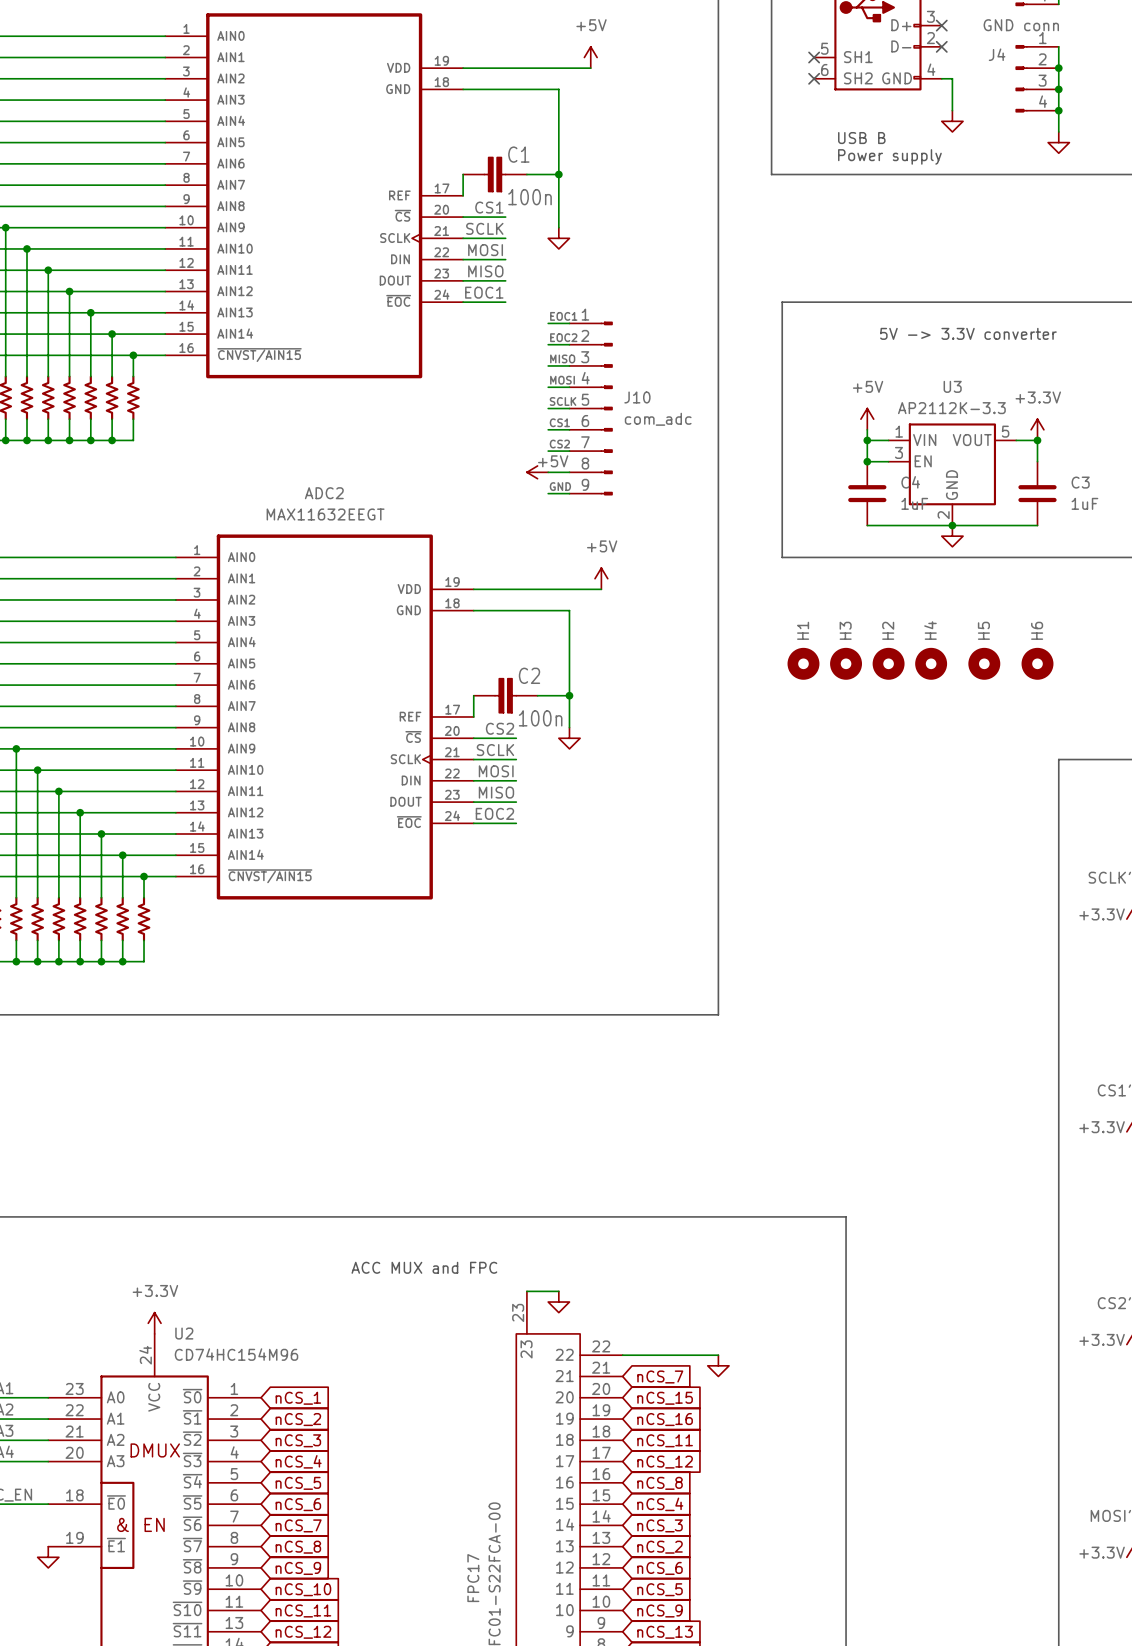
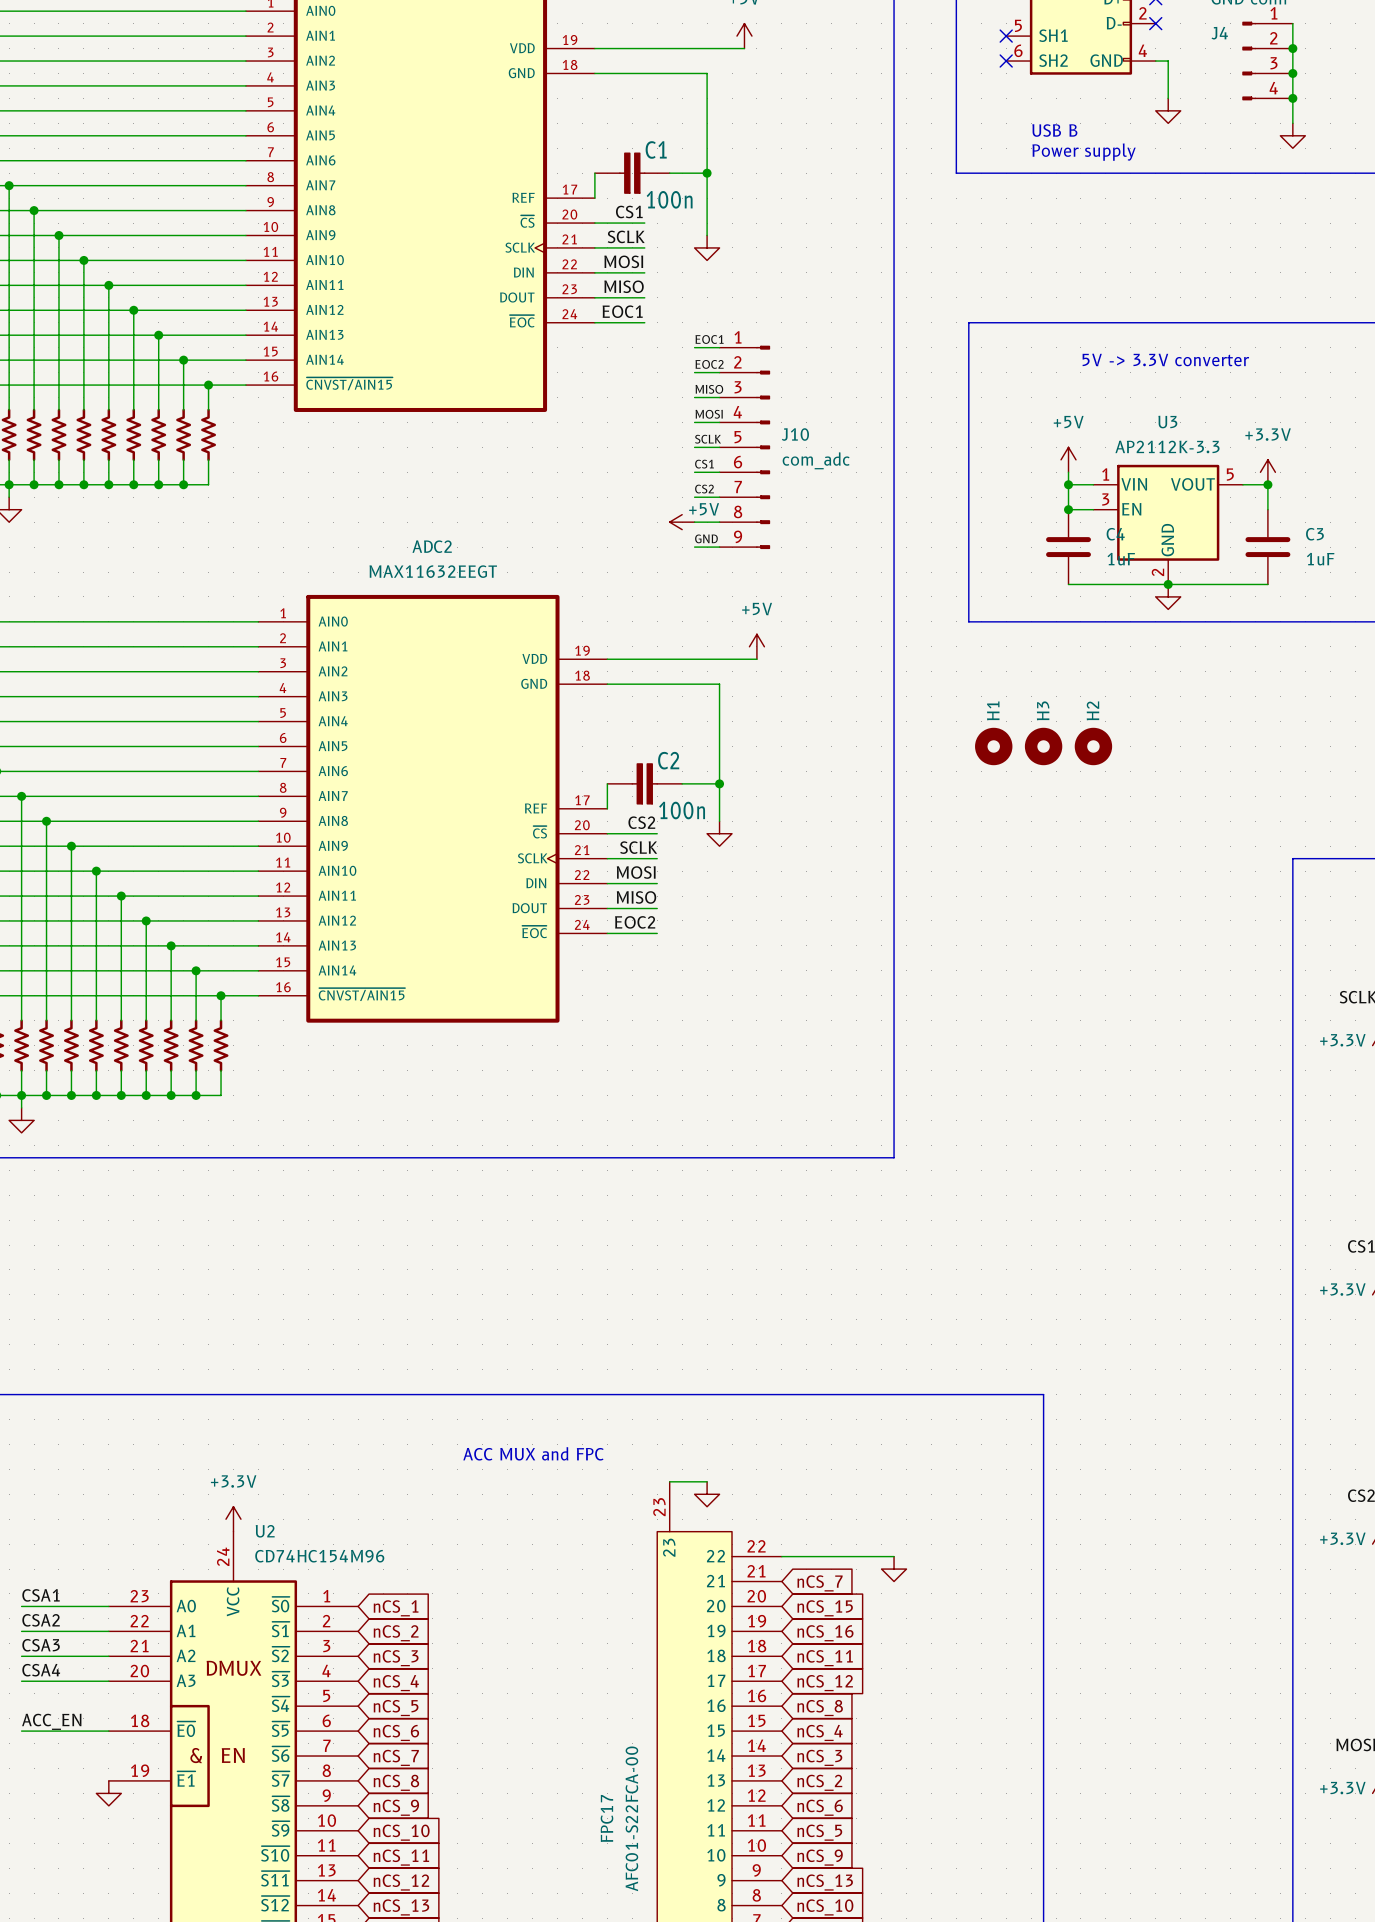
H4: (931, 663) -> none
H5: (984, 663) -> none
H6: (1037, 663) -> none

